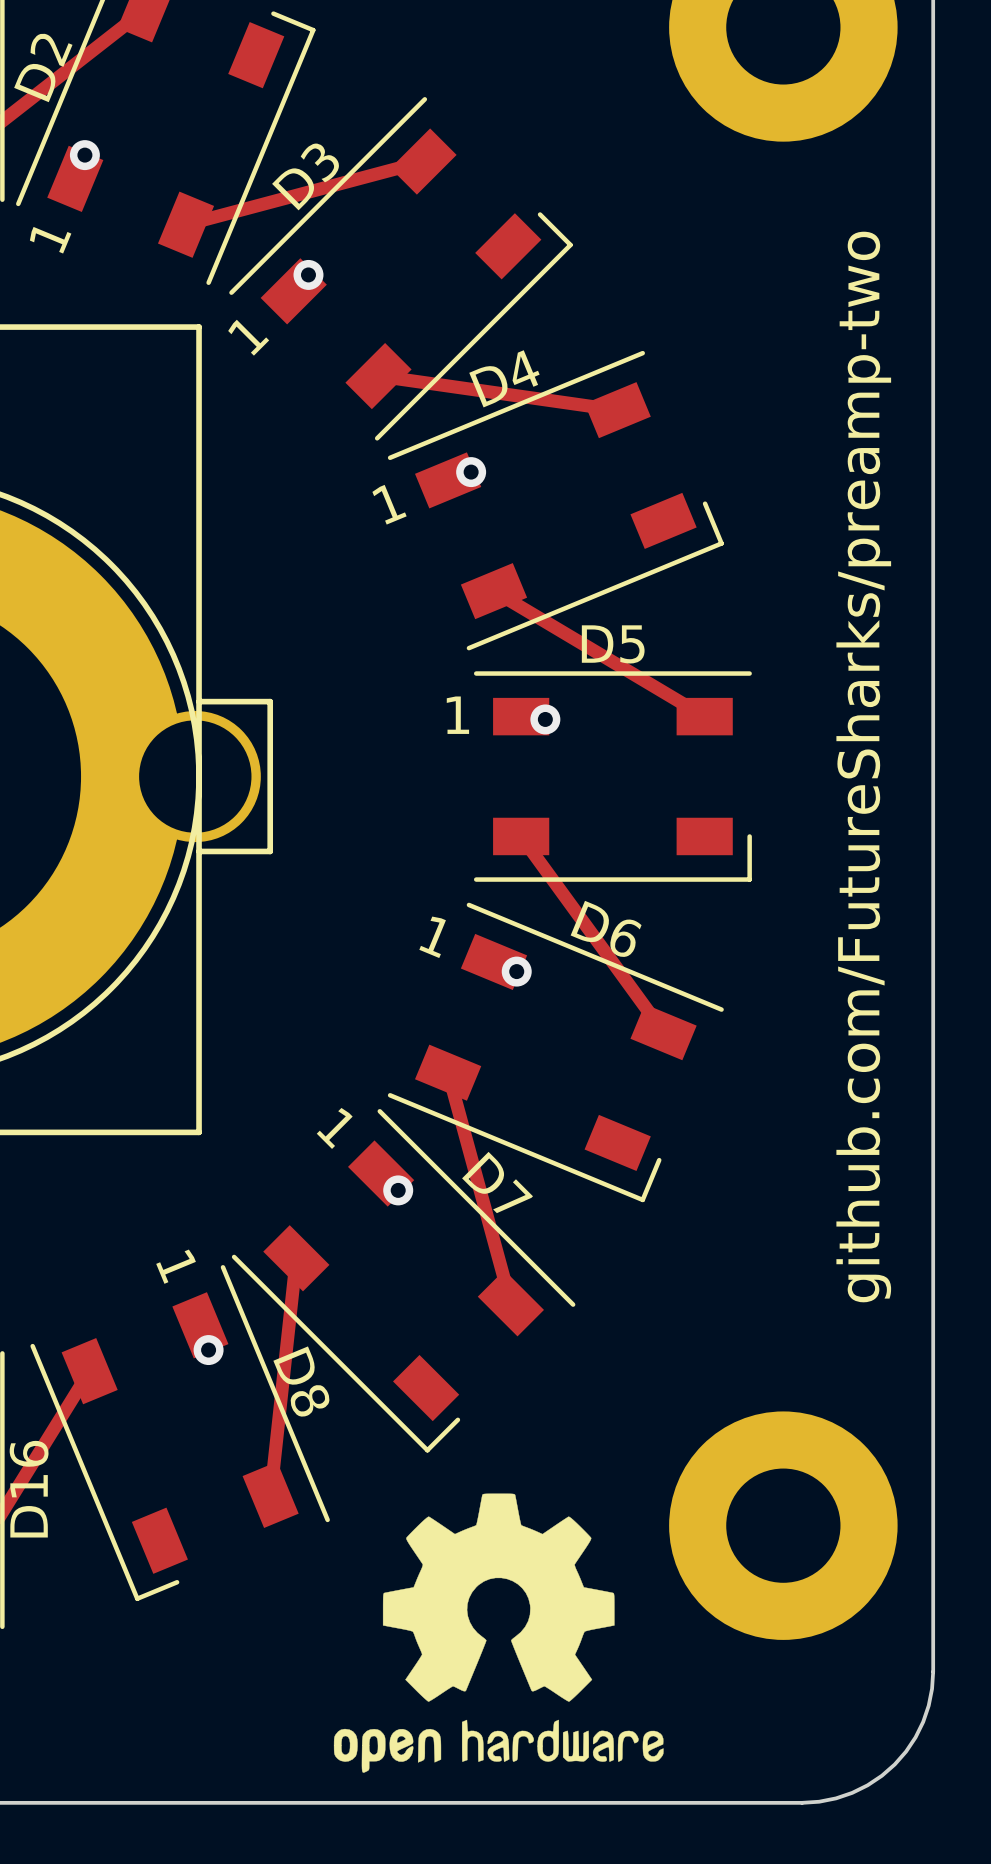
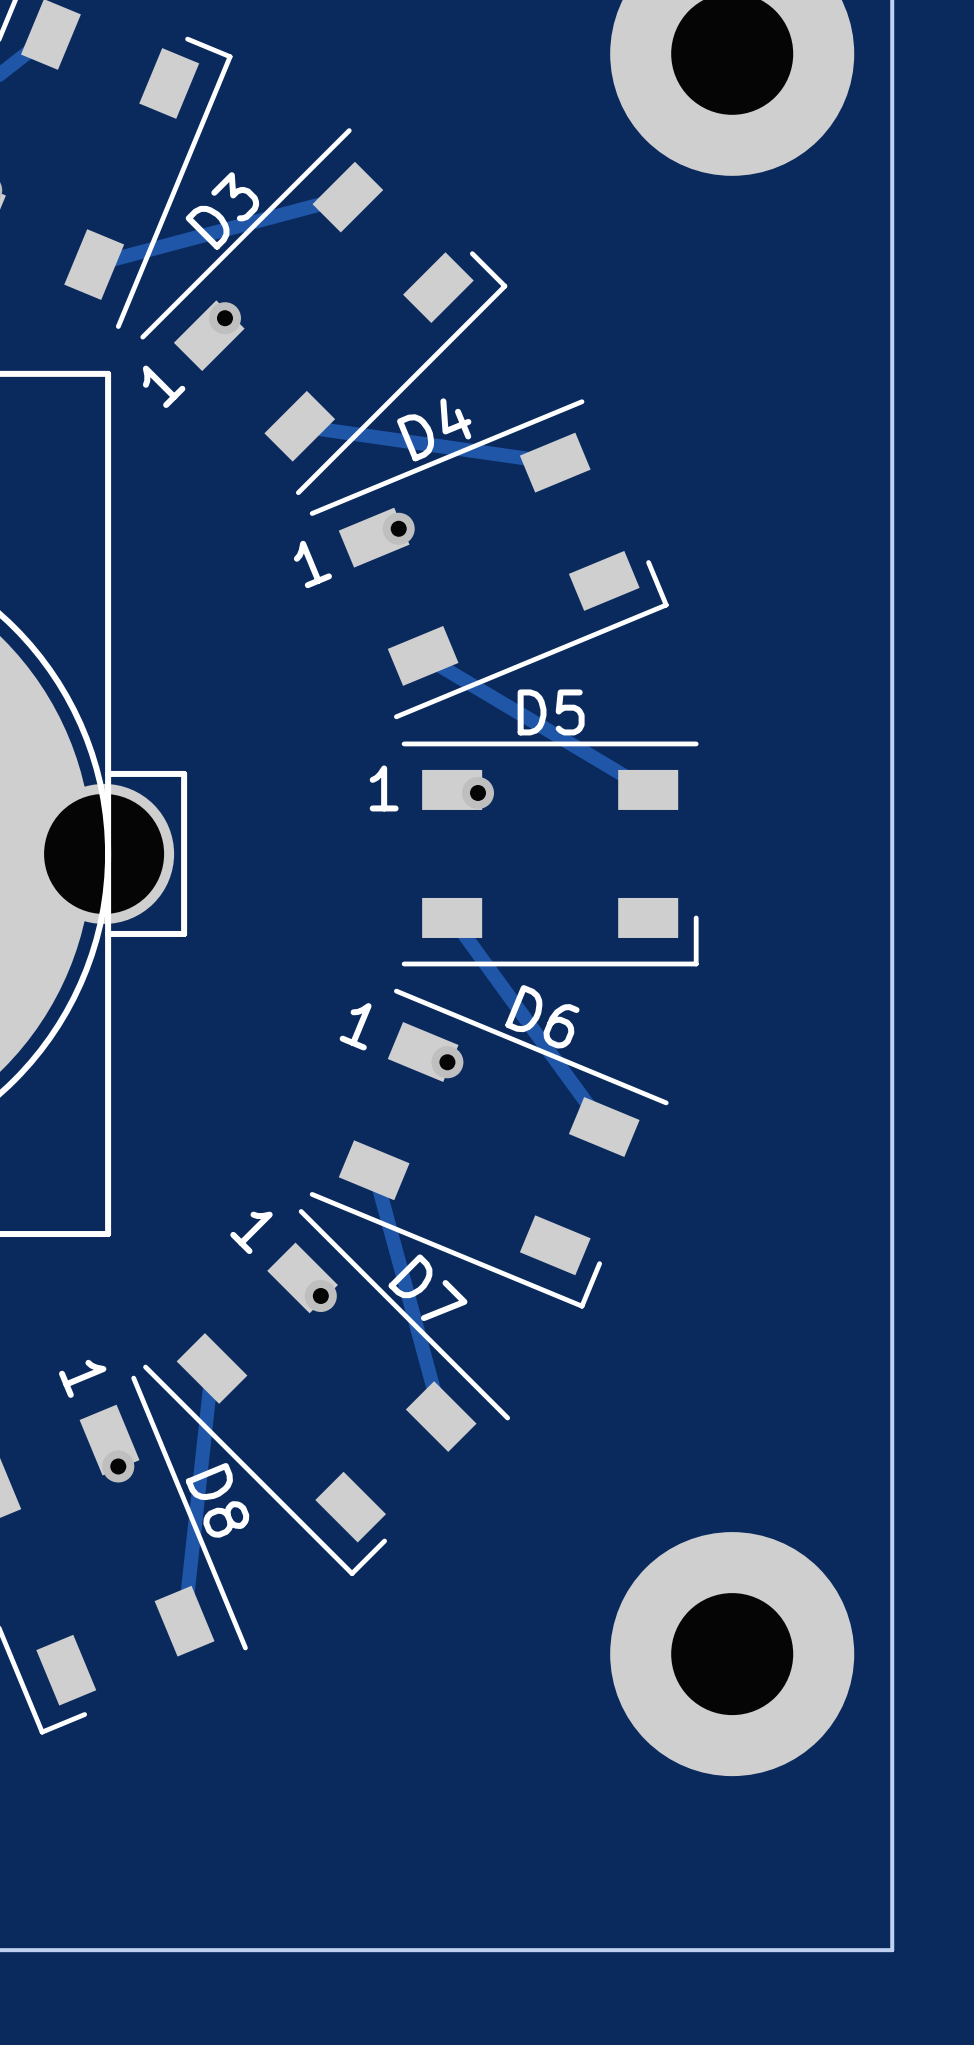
text: github.com/FutureSharks/preamp-two (863, 767) -> none
drawing: [333, 1493, 664, 1773] -> none
board edge: (933, 1671) (928, 1705) (923, 1721) (906, 1751) (894, 1764) (881, 1775) (852, 1792) (836, 1798) (802, 1802) -> (892, 1810) (892, 1950) (752, 1950)

